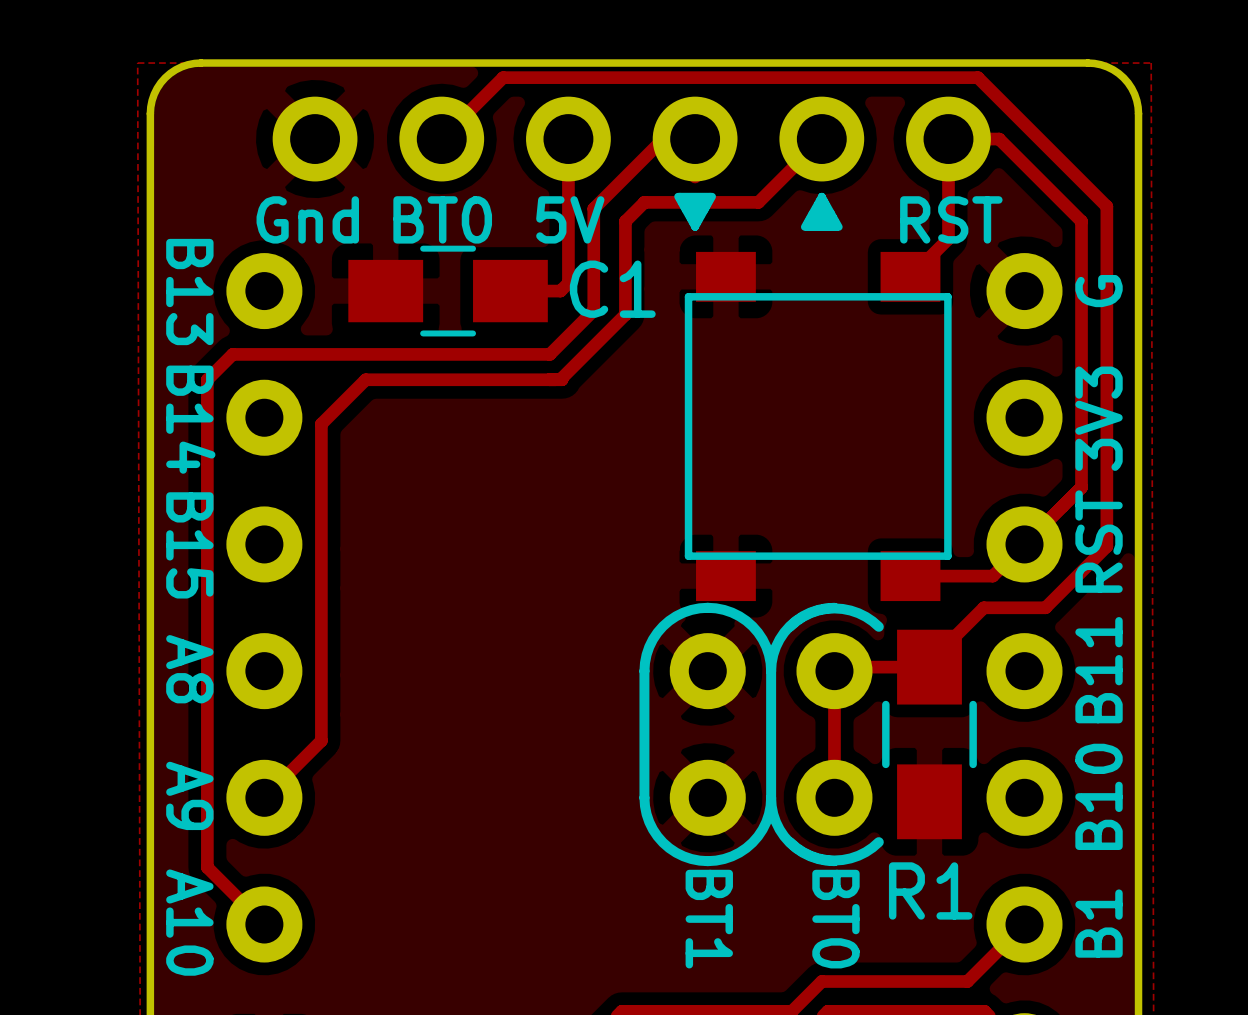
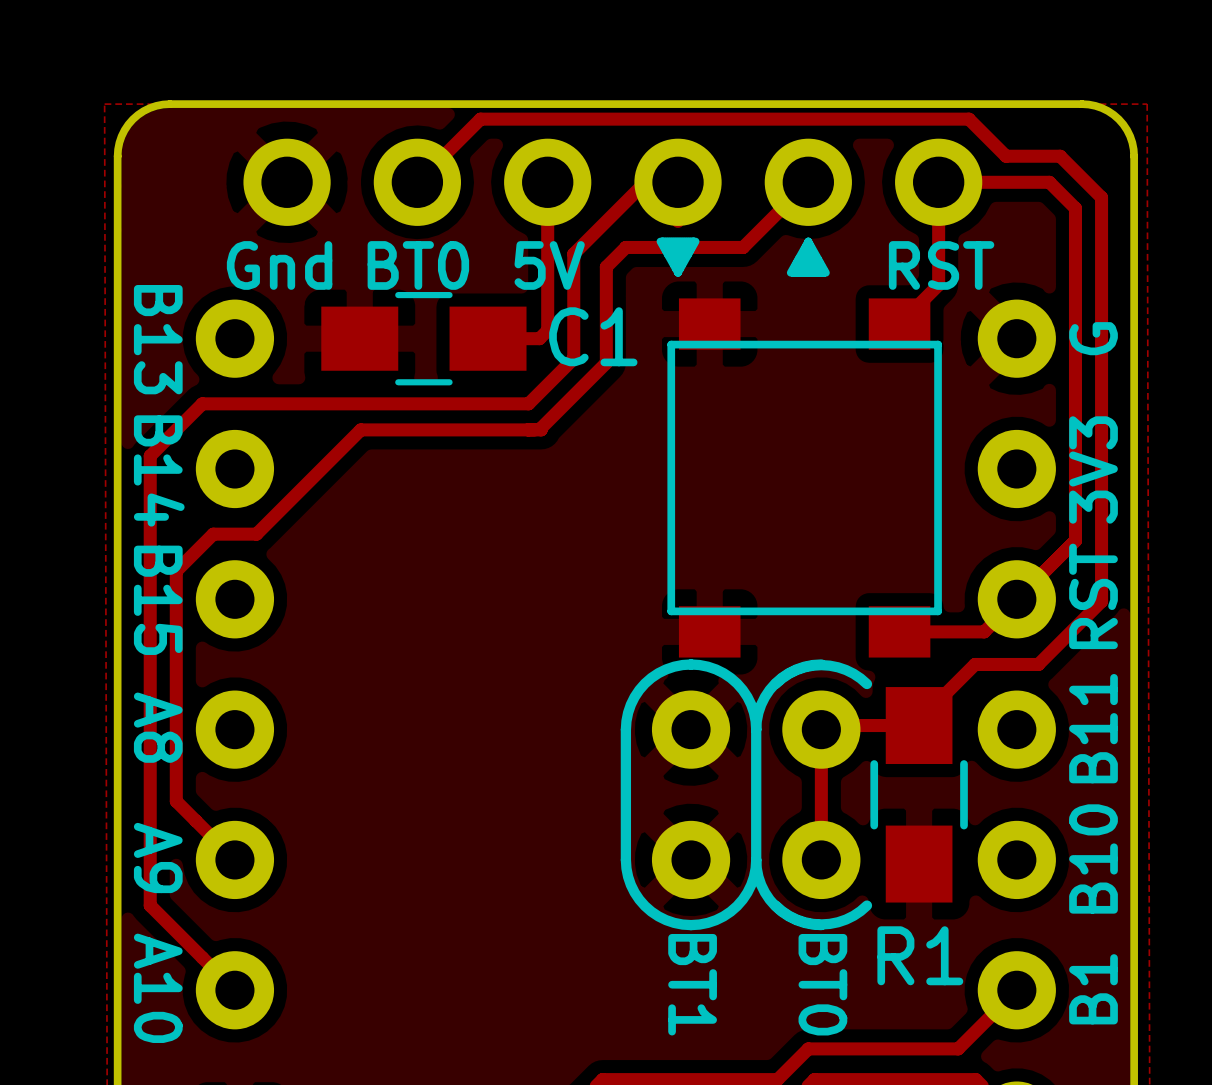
track: (1014, 113) (1106, 206) -> (1006, 156) (1060, 156) (1101, 197) (1101, 251)
track: (999, 139) (1081, 221) -> (990, 182) (1049, 182) (1075, 208) (1075, 267)
track: (207, 379) (207, 517) -> (360, 429) (256, 534) (213, 534) (176, 571)
track: none -> (176, 429) (150, 455) (150, 905) (176, 931)
track: (386, 379) (365, 379) (321, 424) (321, 740) (264, 797) -> none
track: (207, 740) (207, 867) -> (176, 801) (234, 859)

